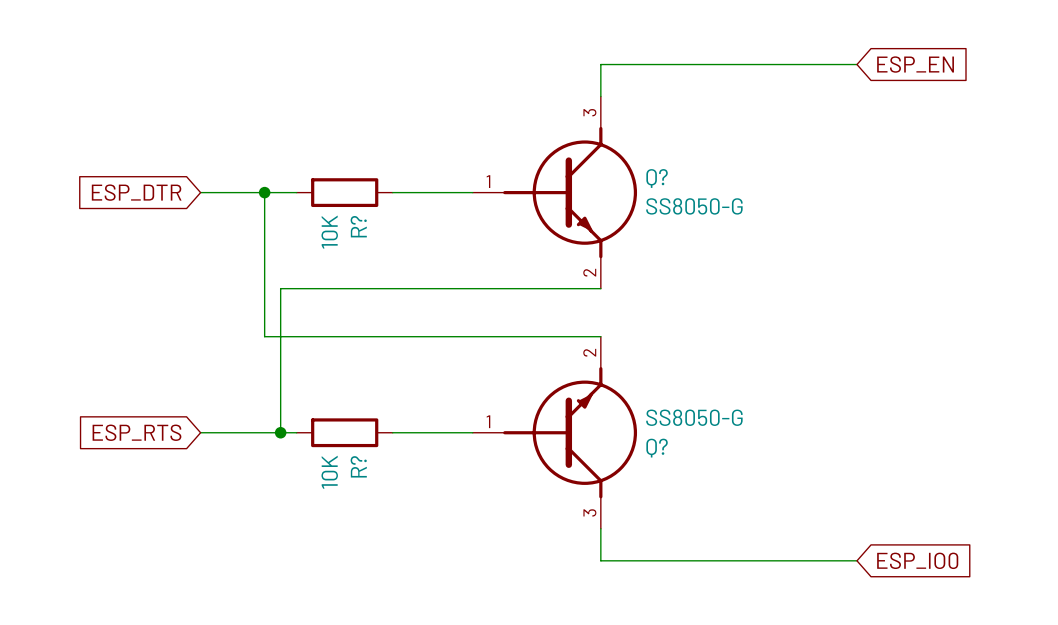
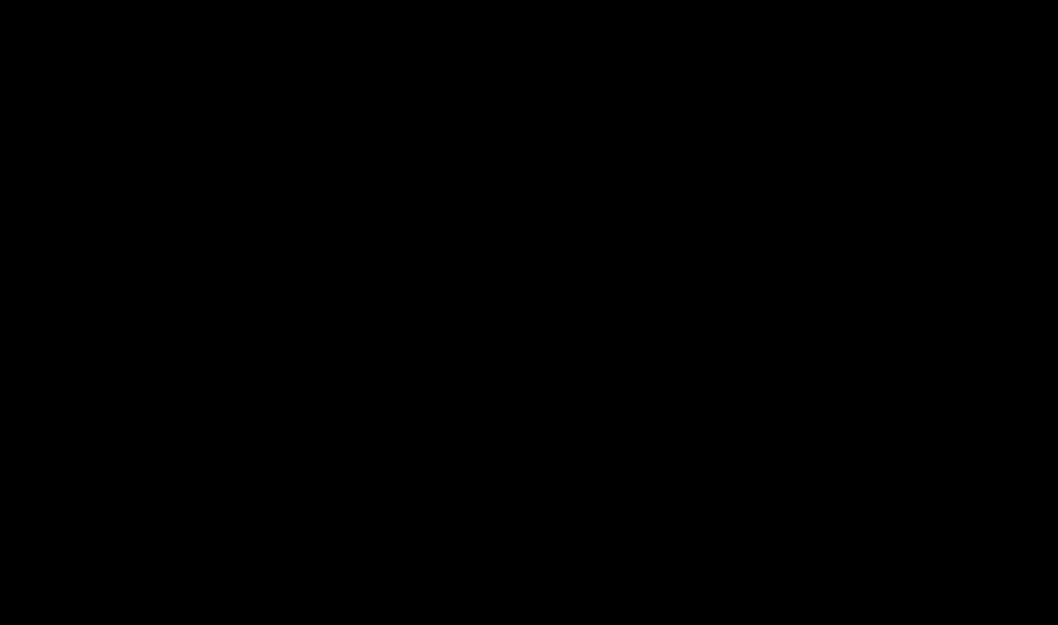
wire: (856, 64) (600, 64) (600, 96) -> none
global label: ESP_EN (915, 64) -> none
global label: ESP_DTR (136, 192) -> none
wire: (200, 192) (296, 192) -> none
wire: (264, 192) (264, 336) (600, 336) -> none
junction: (264, 192) -> none
R?: 10K (344, 192) -> none
wire: (392, 192) (472, 192) -> none
Q?: SS8050-G (554, 192) -> none
wire: (600, 288) (280, 288) (280, 432) -> none
global label: ESP_RTS (136, 432) -> none
wire: (200, 432) (296, 432) -> none
junction: (280, 432) -> none
R?: 10K (344, 432) -> none
wire: (392, 432) (472, 432) -> none
Q?: SS8050-G (554, 432) -> none
wire: (600, 528) (600, 560) (856, 560) -> none
global label: ESP_IO0 (917, 560) -> none

